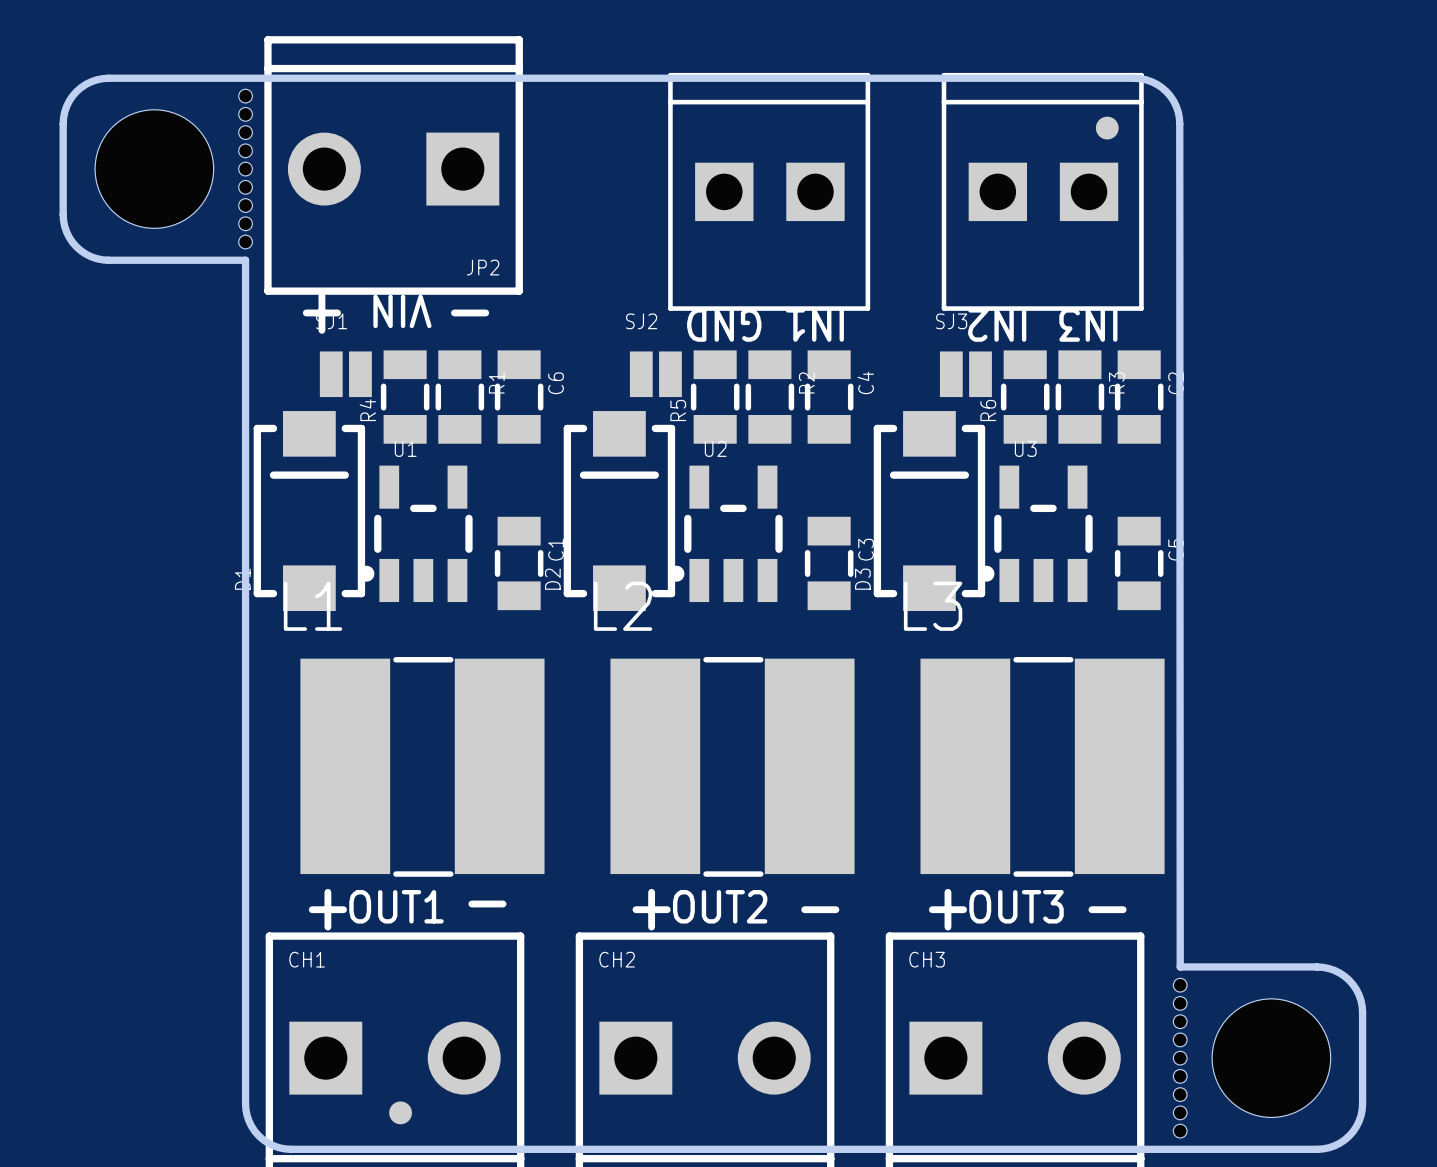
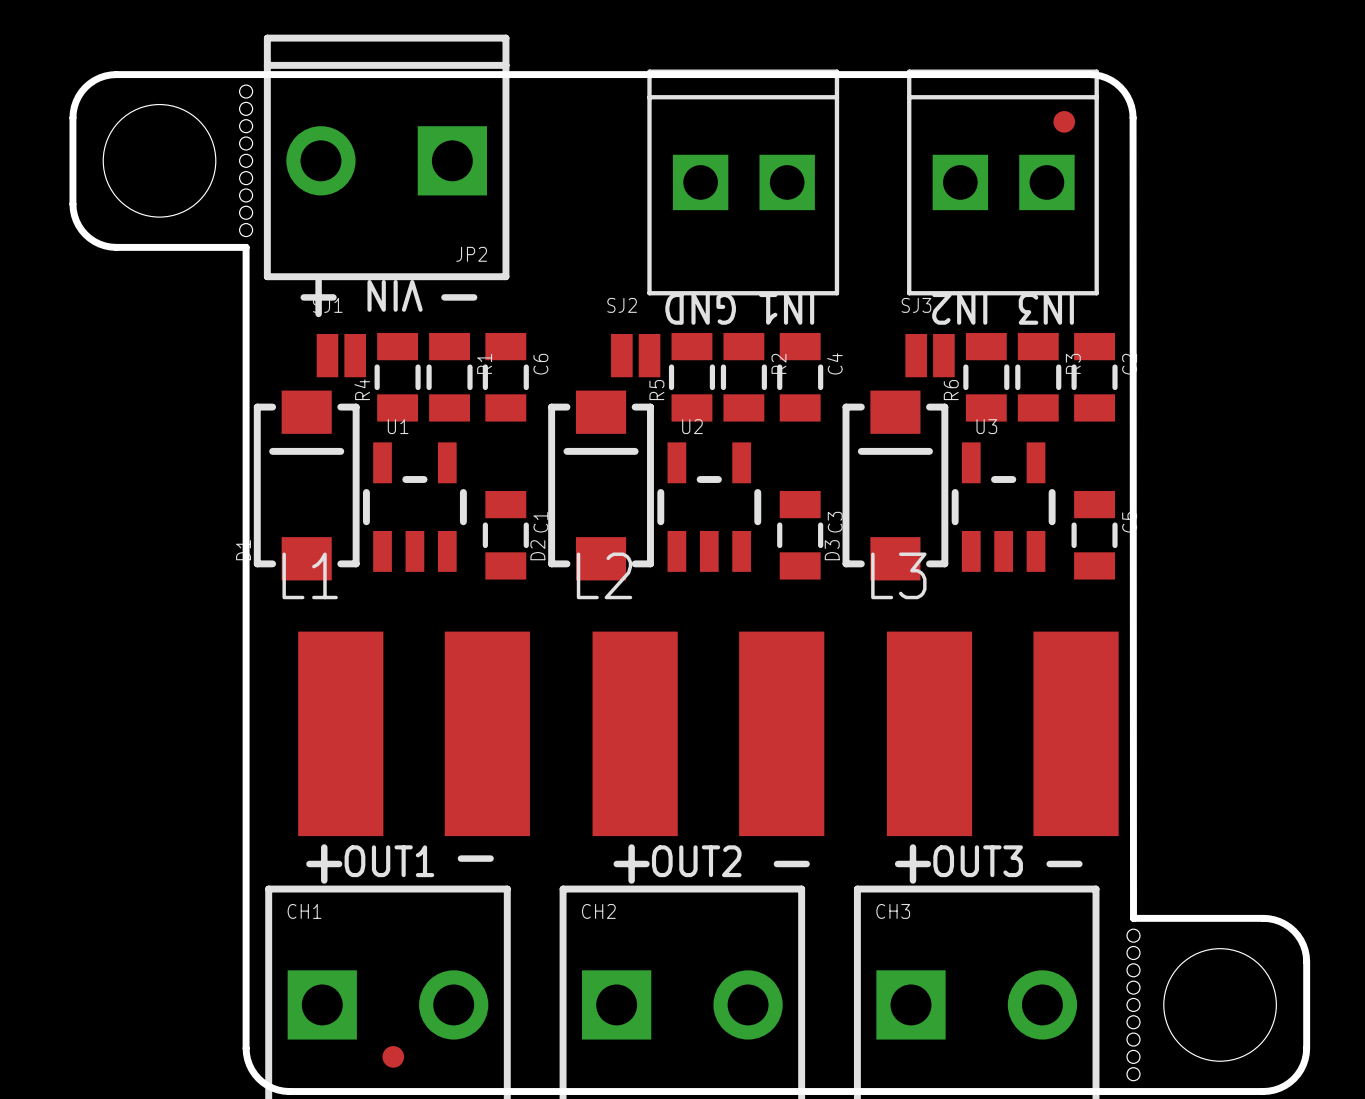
U1 footprint: [358, 465, 473, 603] -> [362, 442, 467, 572]
U2 footprint: [668, 465, 783, 603] -> [657, 442, 762, 572]
U3 footprint: [978, 465, 1093, 603] -> [951, 442, 1056, 572]
L1 footprint: [300, 657, 545, 877] -> [298, 631, 530, 837]
L2 footprint: [610, 657, 855, 877] -> [592, 631, 825, 837]
L3 footprint: [920, 657, 1165, 877] -> [886, 631, 1119, 837]

